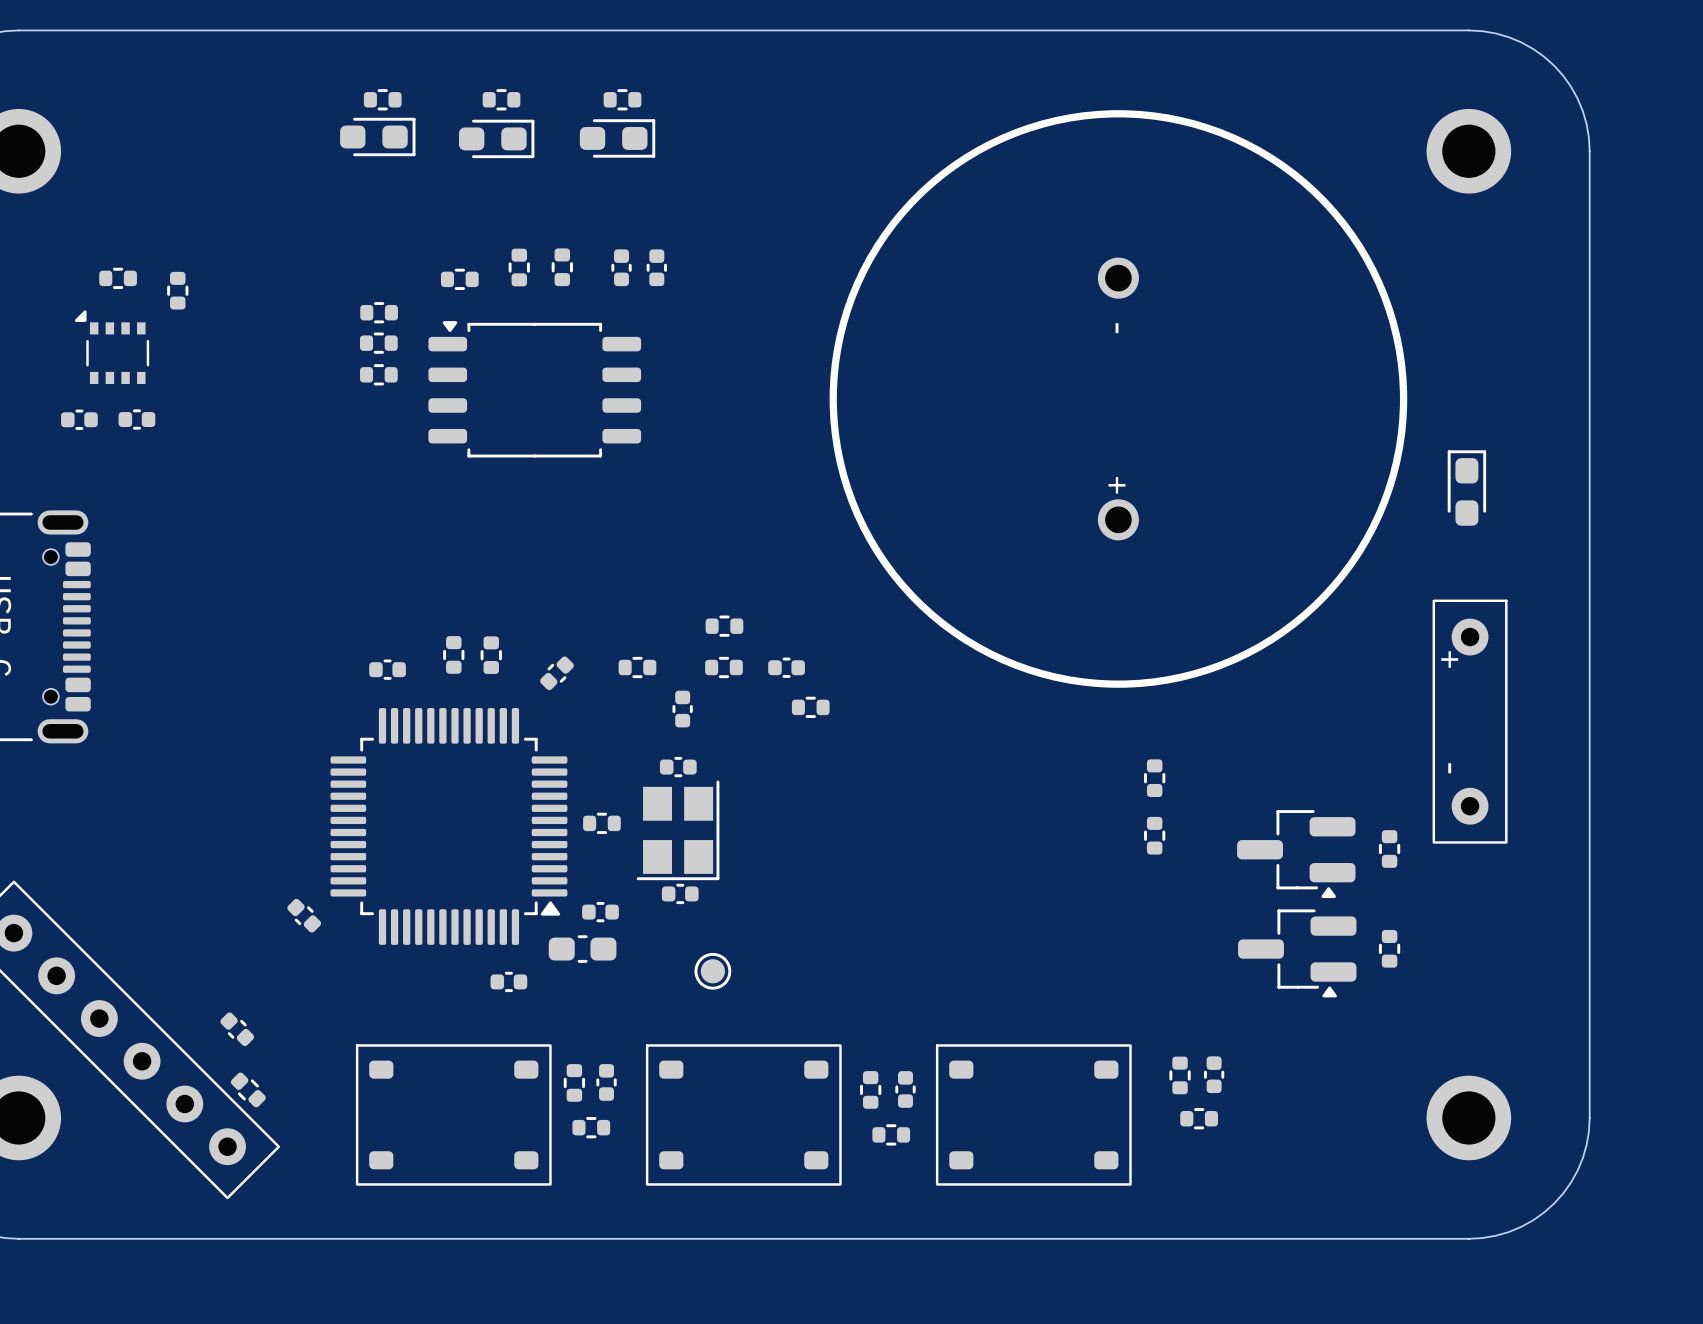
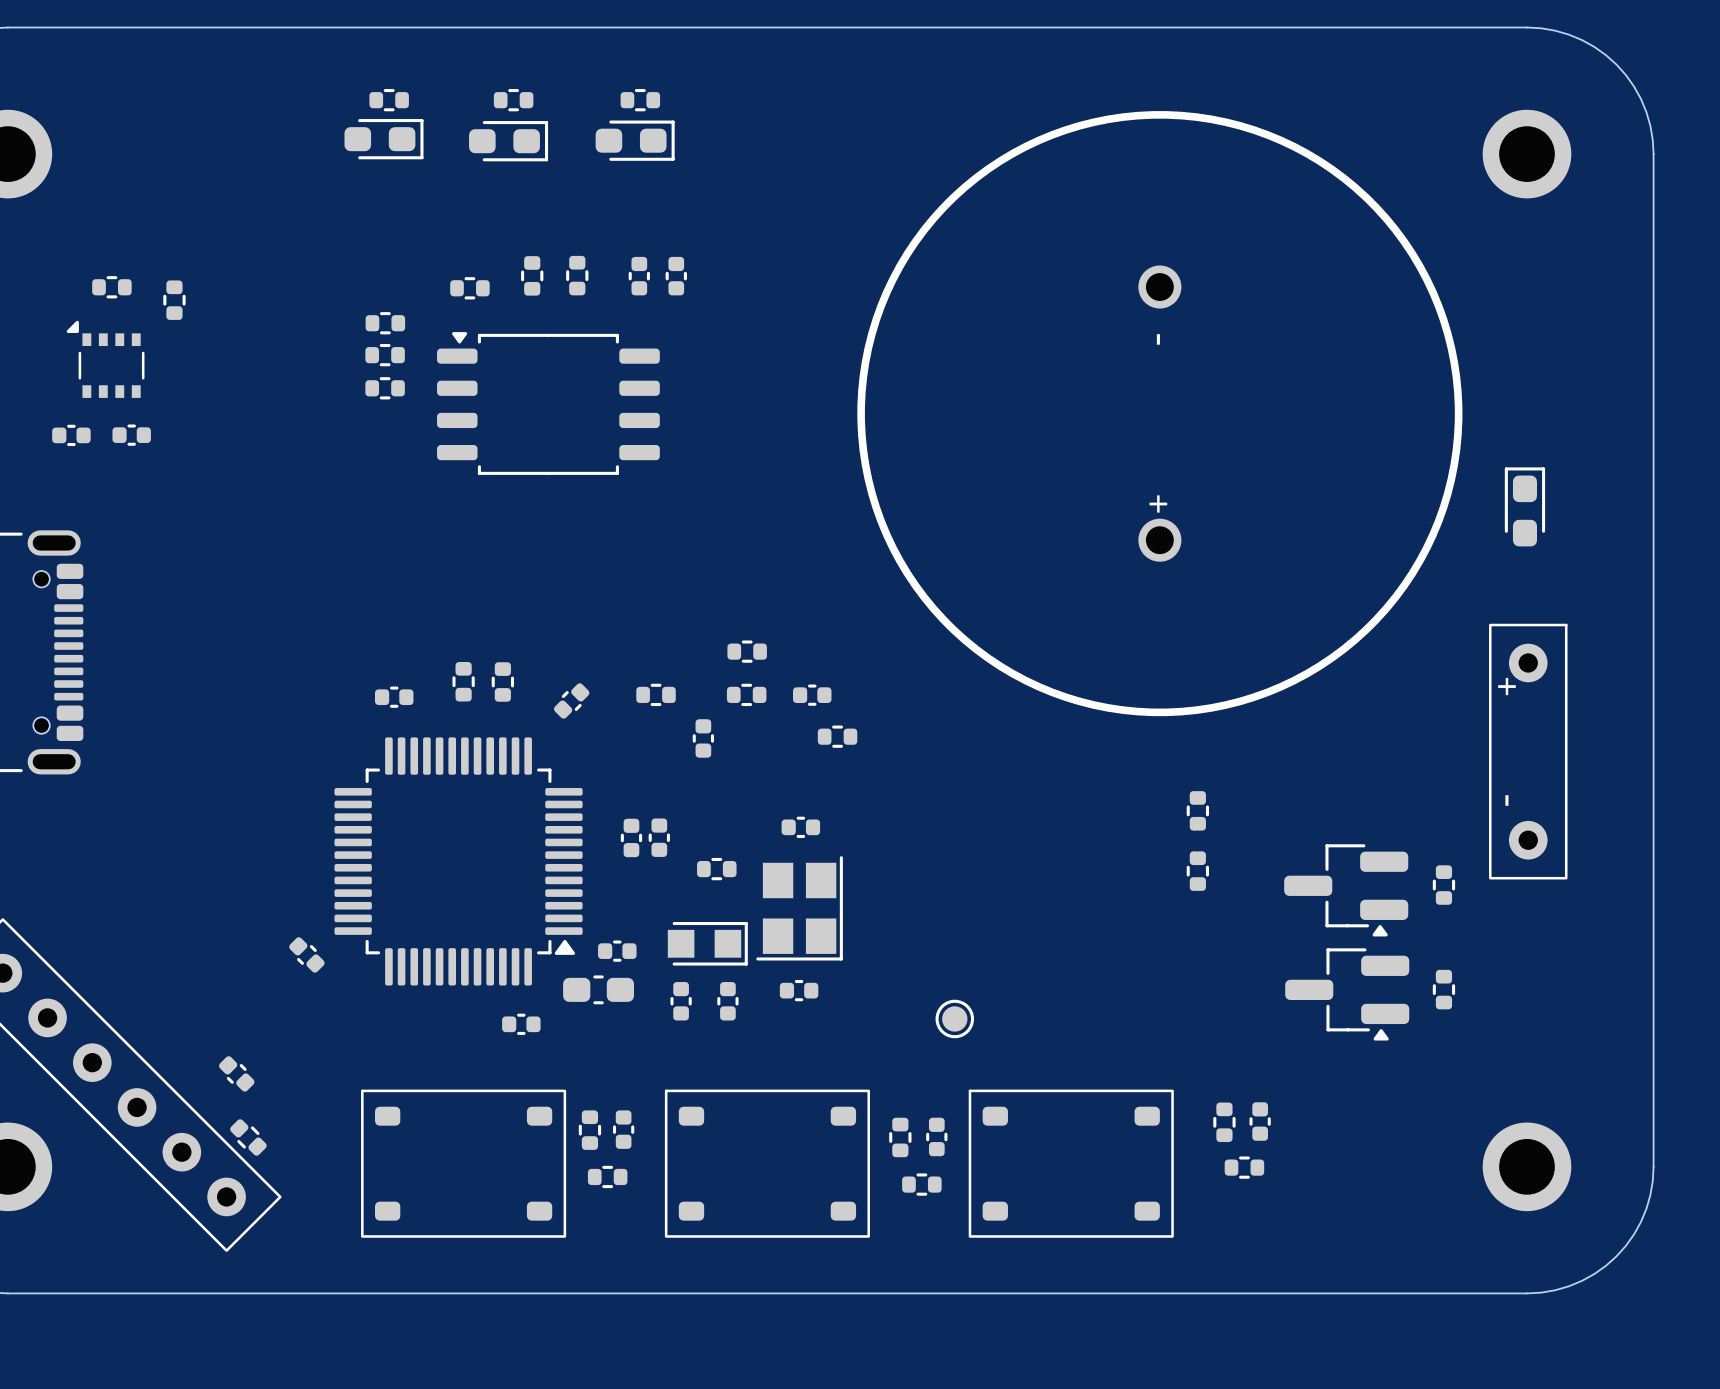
part: (678, 767) -> none
part footprint: [636, 780, 720, 881] -> [697, 857, 737, 881]
part: none -> (800, 827)
part: none -> (659, 837)
part: none -> (631, 837)
part: (601, 823) -> none
part: none -> (799, 908)
part footprint: [661, 883, 699, 905] -> [667, 922, 748, 966]
part: none -> (799, 990)
part footprint: [694, 952, 732, 990] -> [717, 982, 739, 1021]
part: none -> (681, 1001)
part: none -> (954, 1018)

